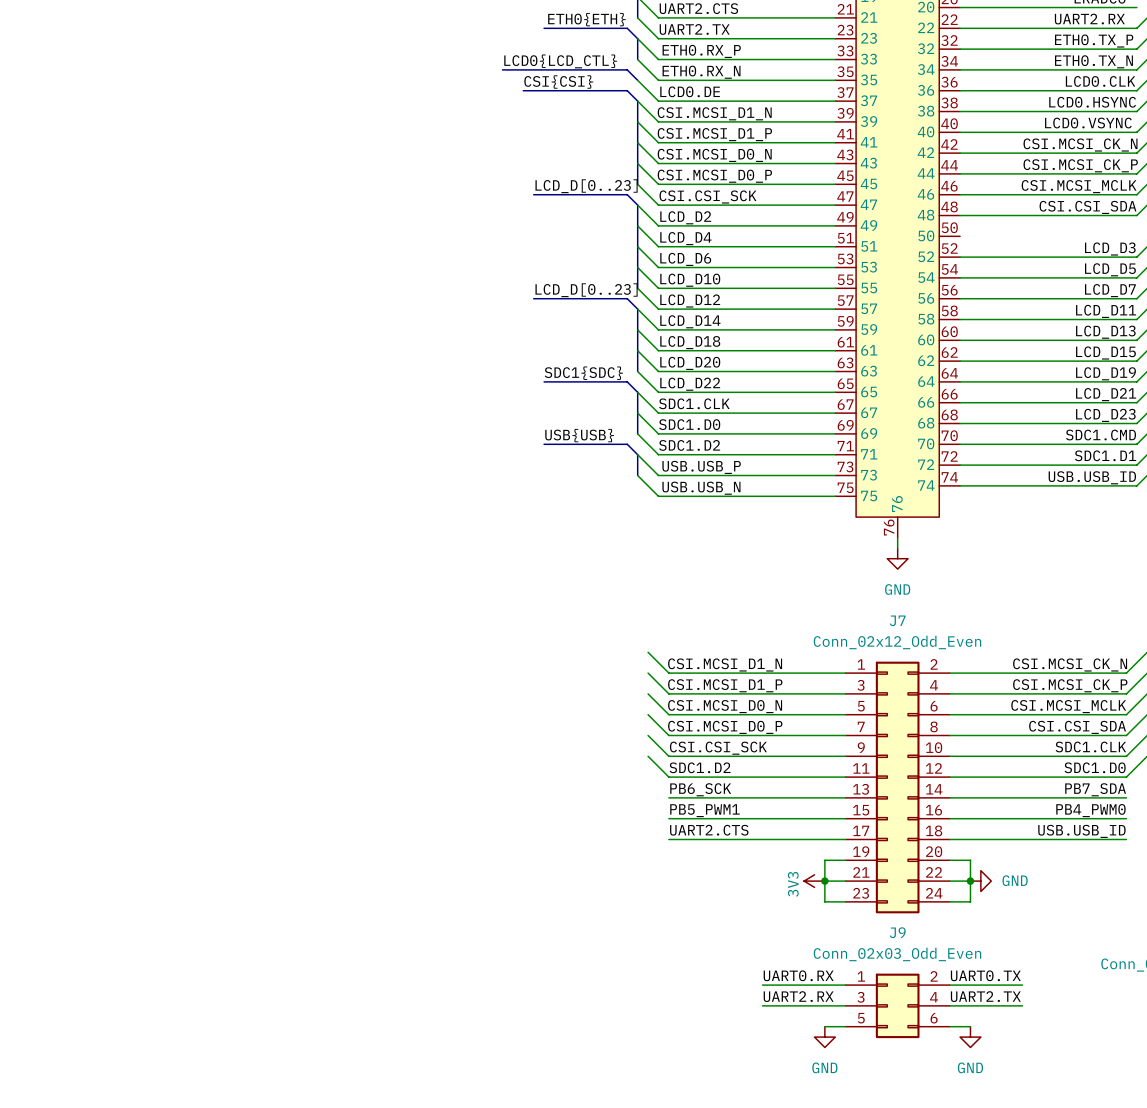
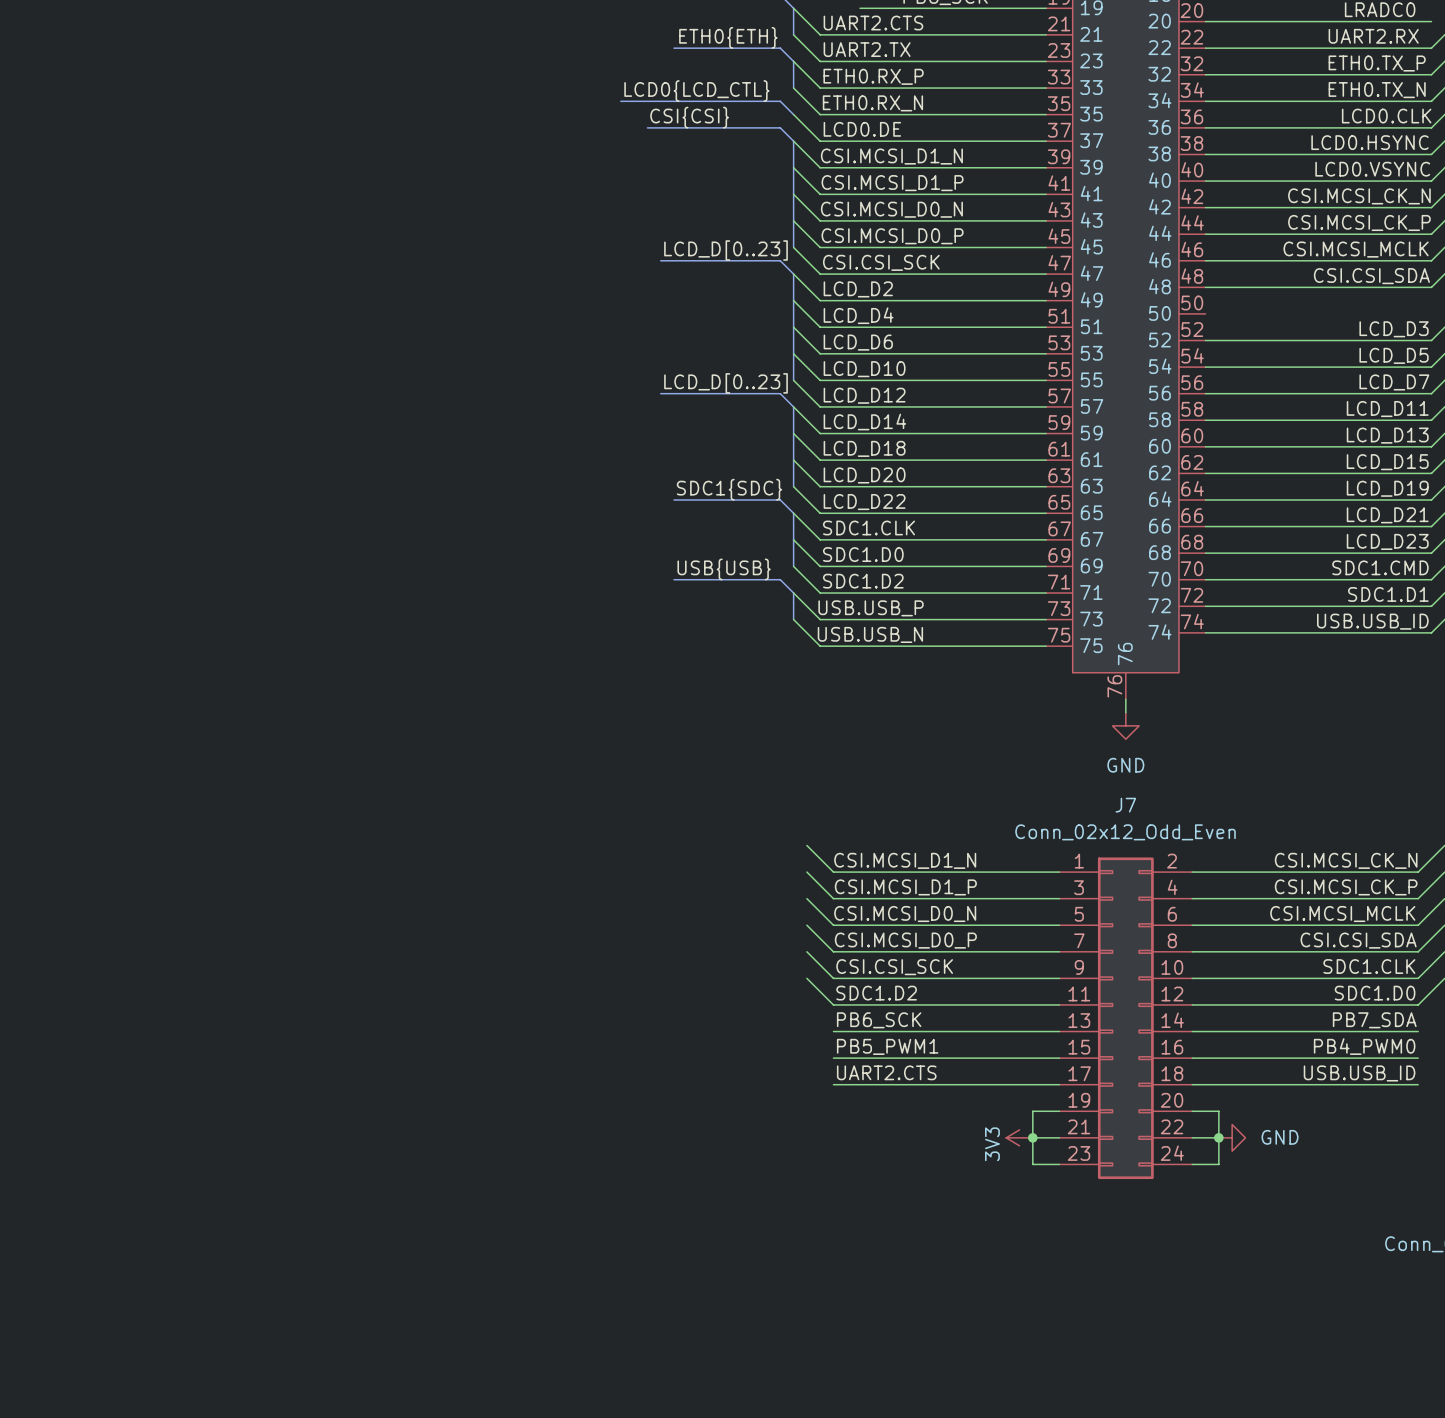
label: UART0.RX (798, 975) -> none
label: UART0.TX (985, 975) -> none
wire: (762, 985) (845, 985) -> none
wire: (949, 985) (1022, 985) -> none
label: UART2.RX (798, 996) -> none
label: UART2.TX (985, 996) -> none
wire: (762, 1005) (845, 1005) -> none
J9: Conn_02x03_Odd_Even (897, 1005) -> none
wire: (949, 1005) (1022, 1005) -> none
wire: (824, 1026) (845, 1026) -> none
wire: (949, 1026) (970, 1026) -> none
power symbol: GND (824, 1037) -> none
power symbol: GND (970, 1037) -> none

